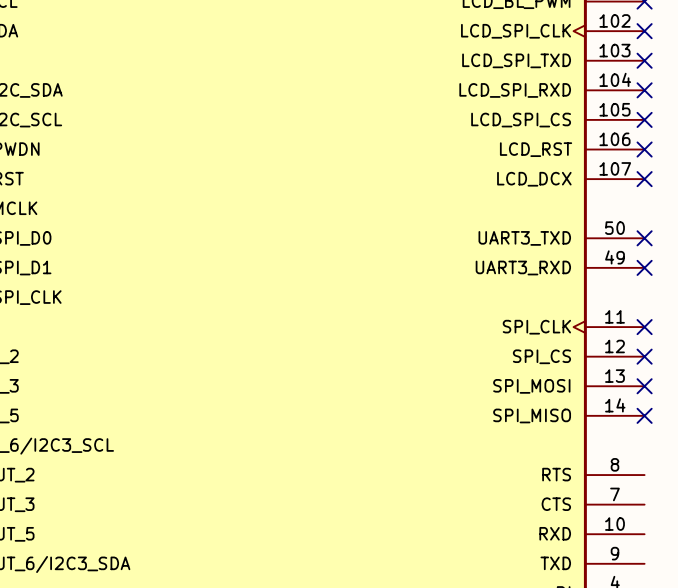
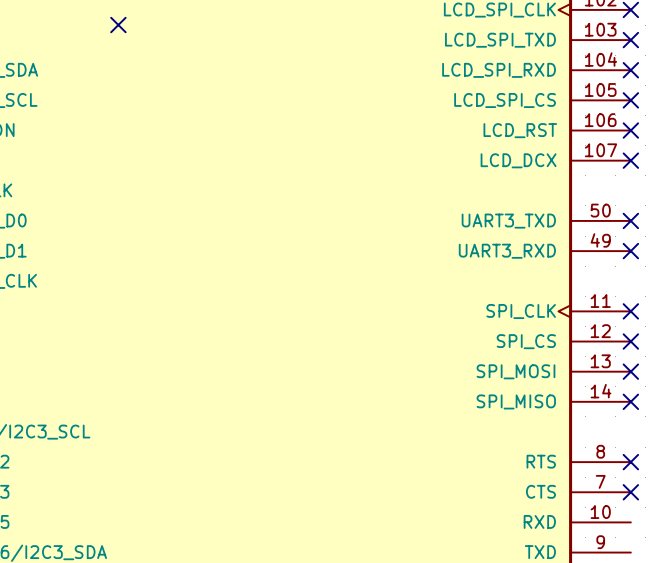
no-connect mark: none -> (118, 25)
no-connect mark: none -> (630, 462)
no-connect mark: none -> (630, 492)

